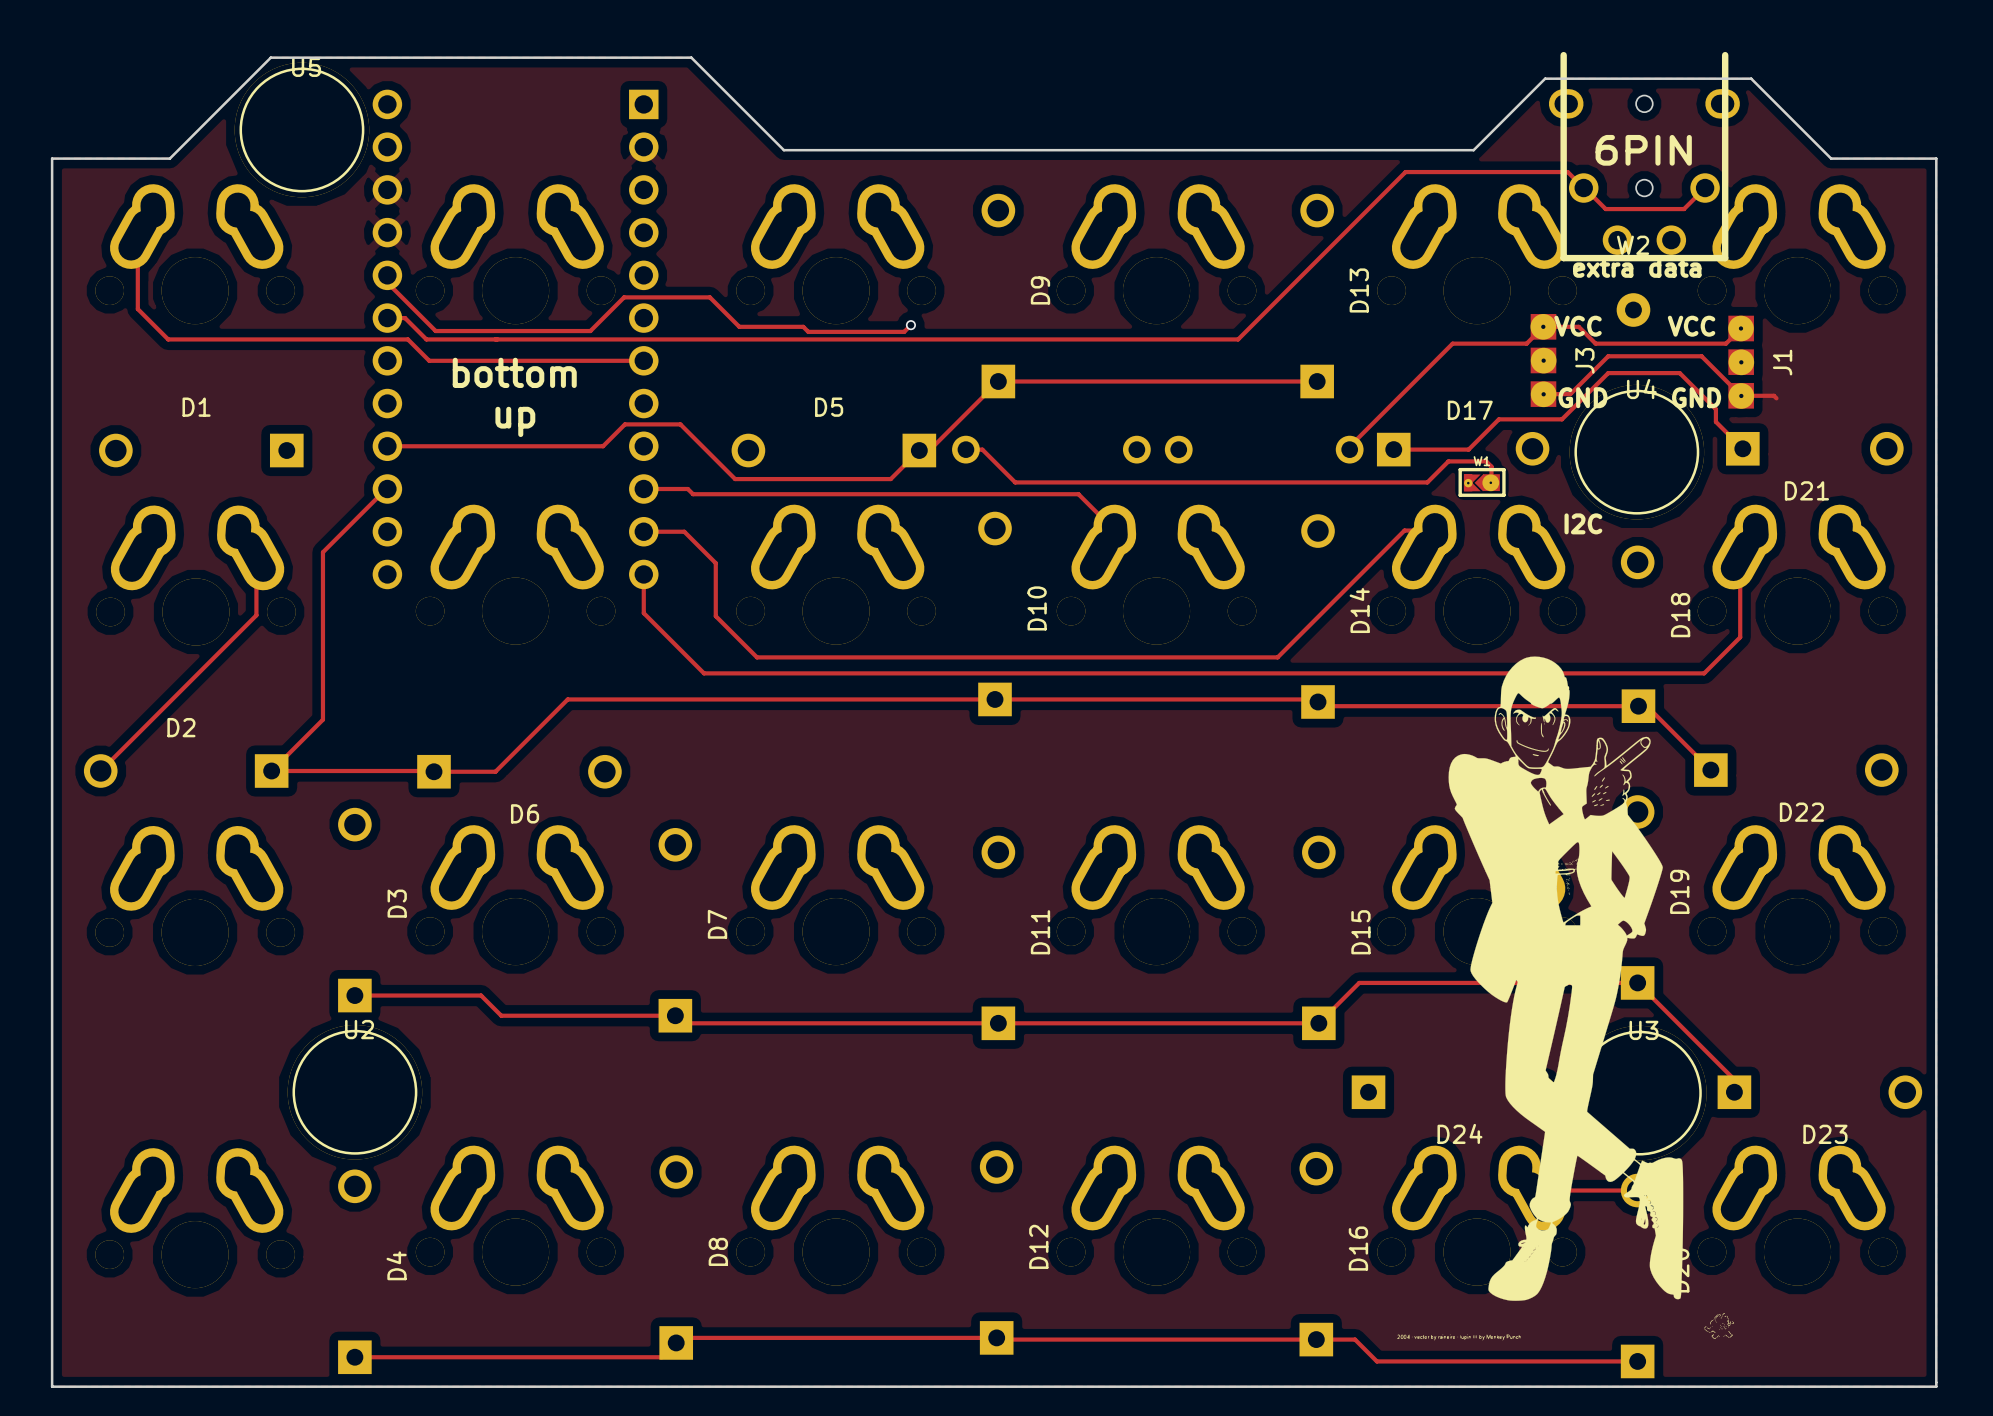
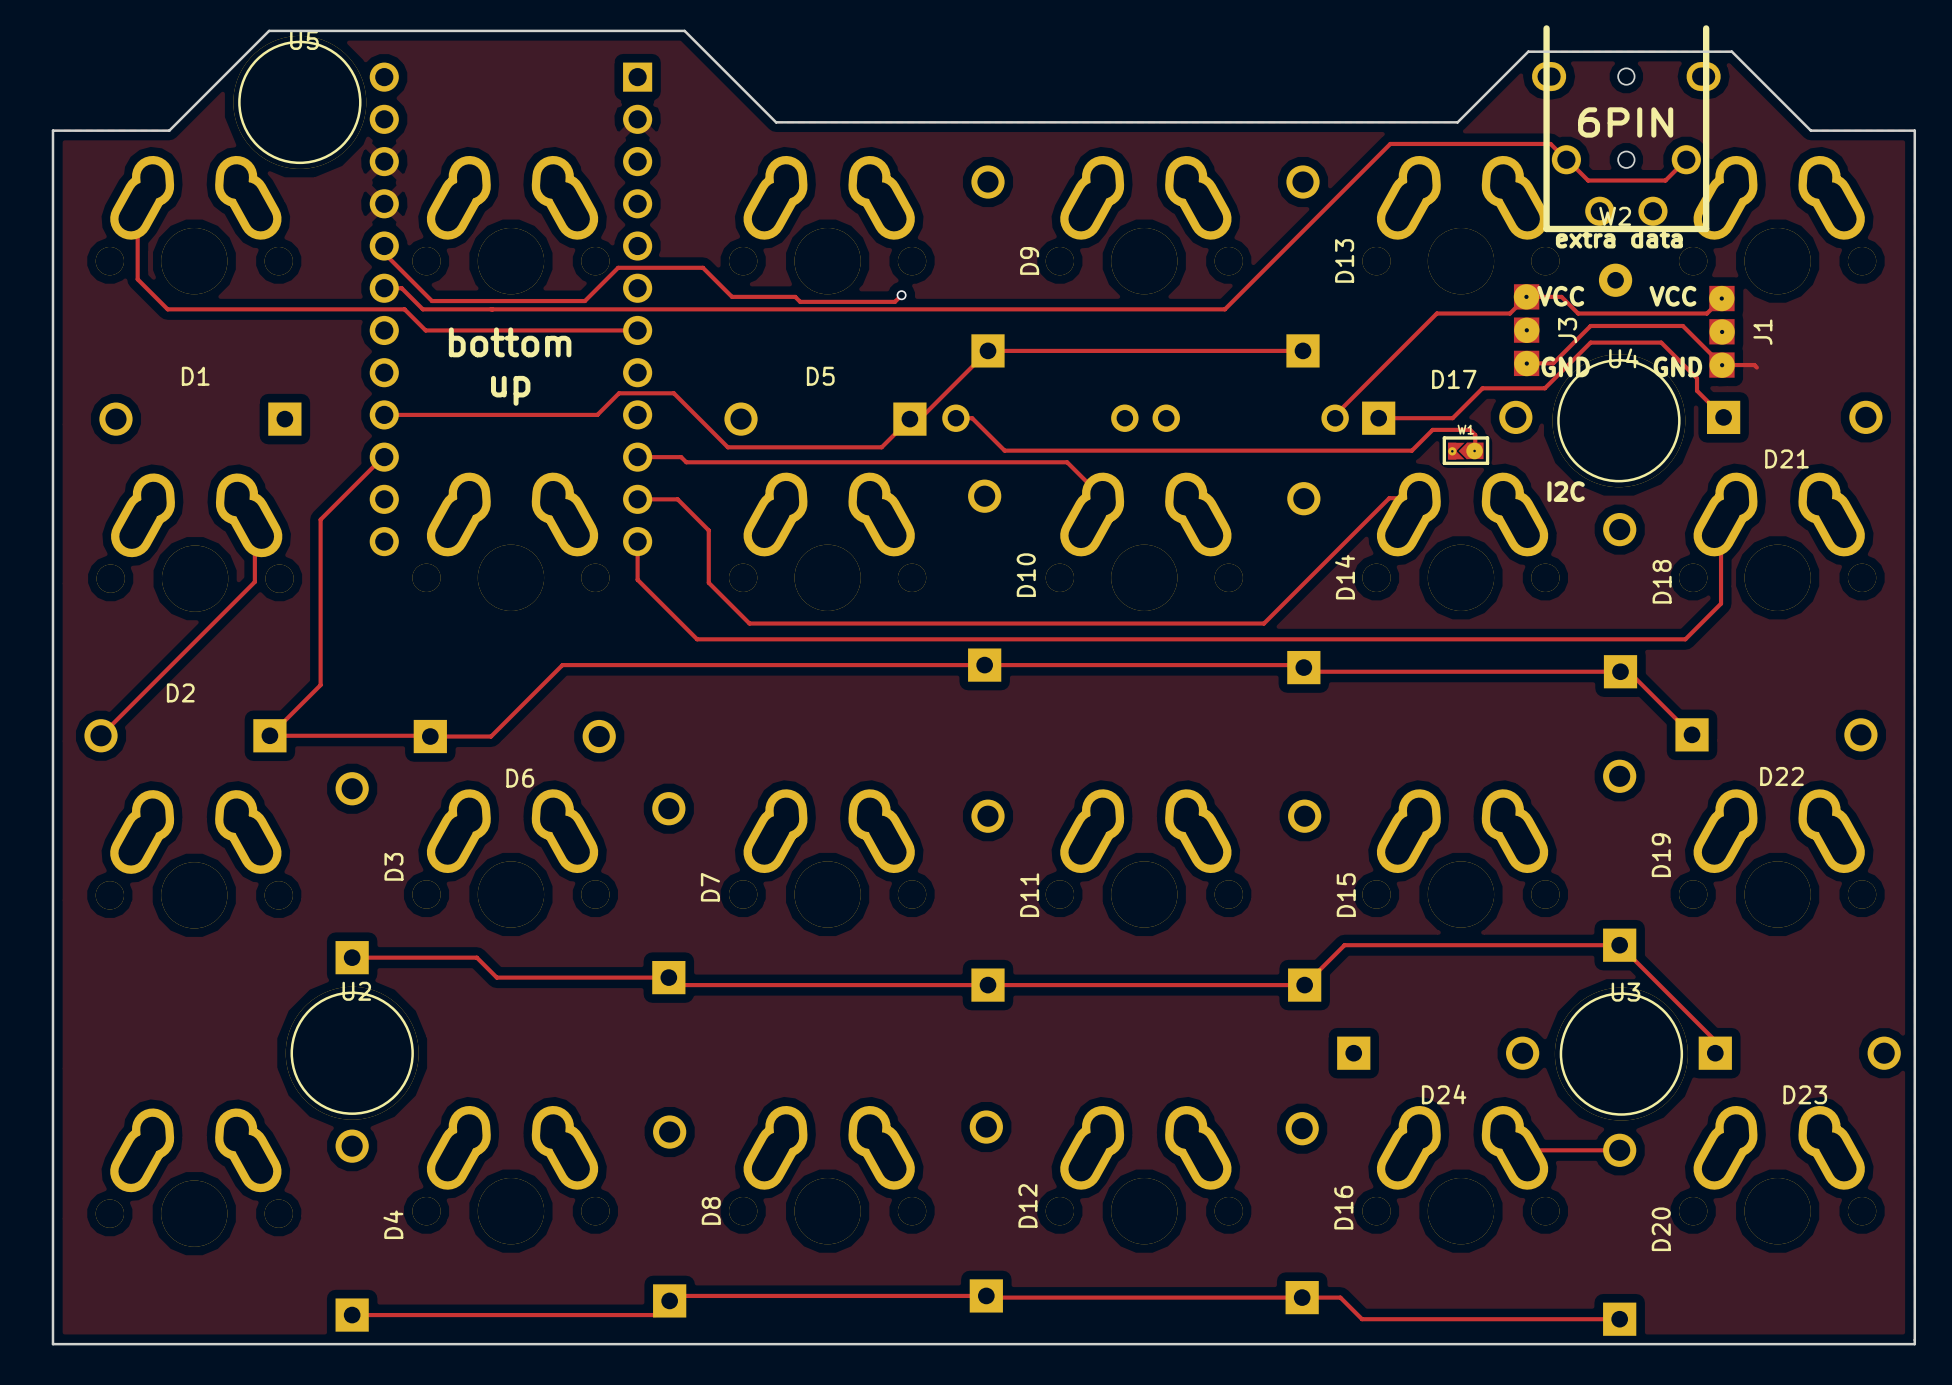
drawing: [1397, 656, 1735, 1341] -> none

